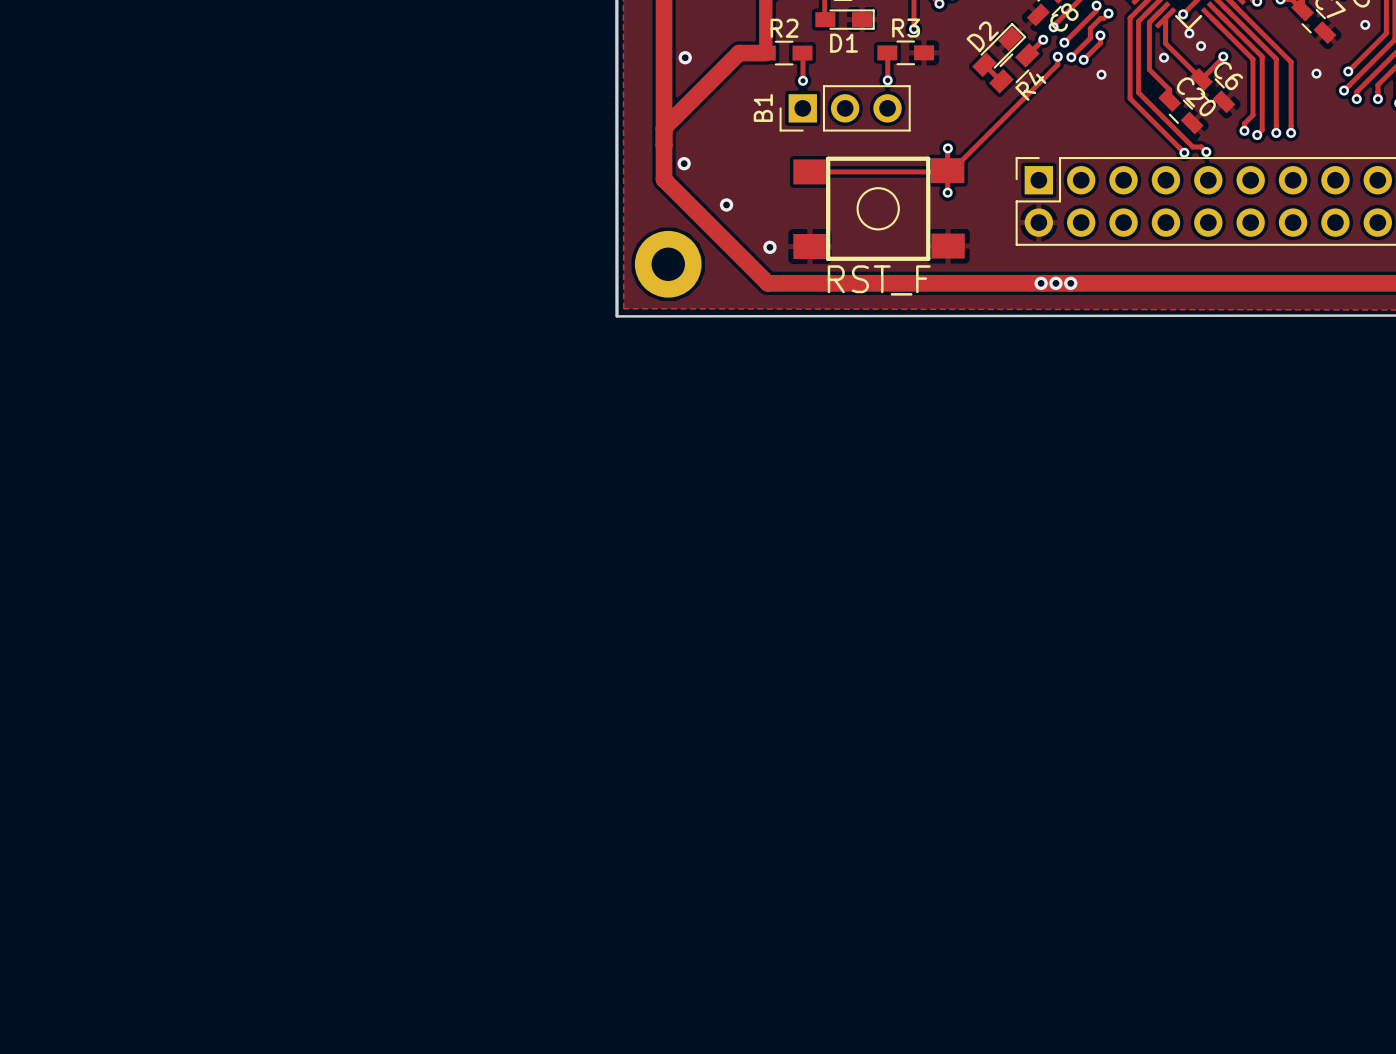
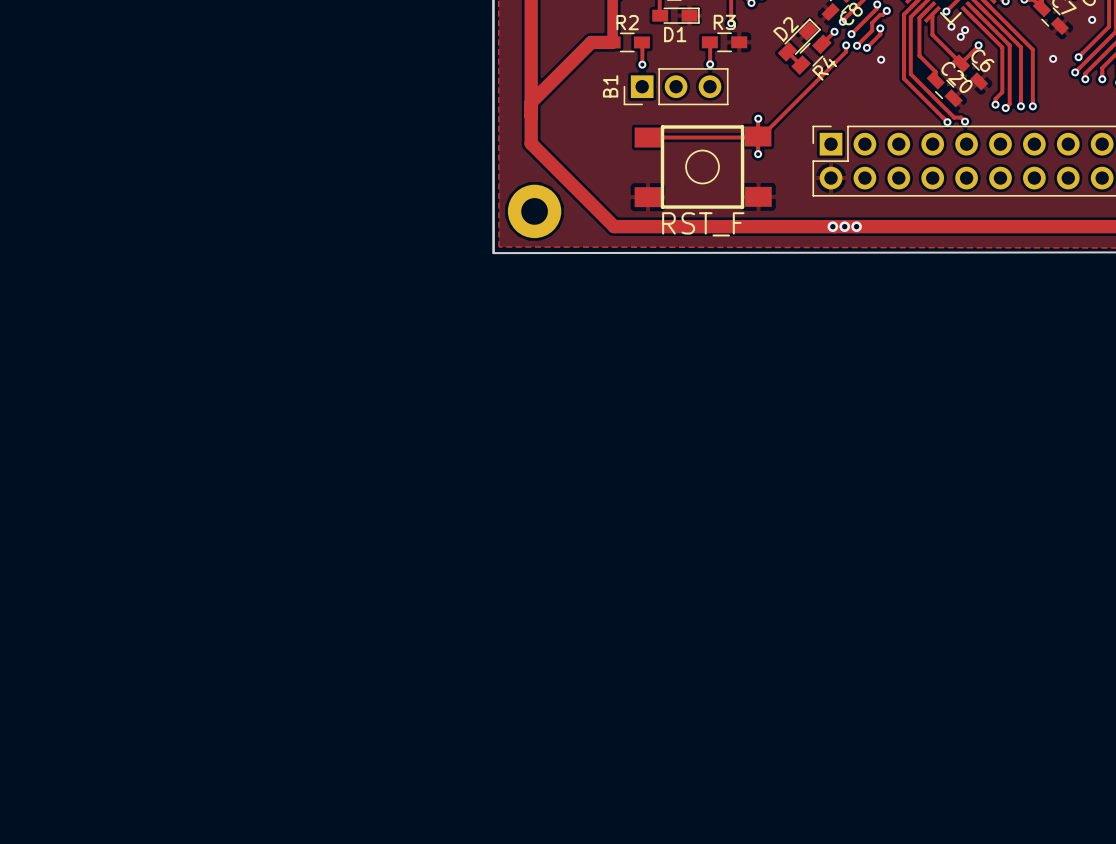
via: (685, 57) -> none
via position: (1163, 57) -> (965, 30)
via: (684, 163) -> none
via: (726, 204) -> none
via: (769, 247) -> none

